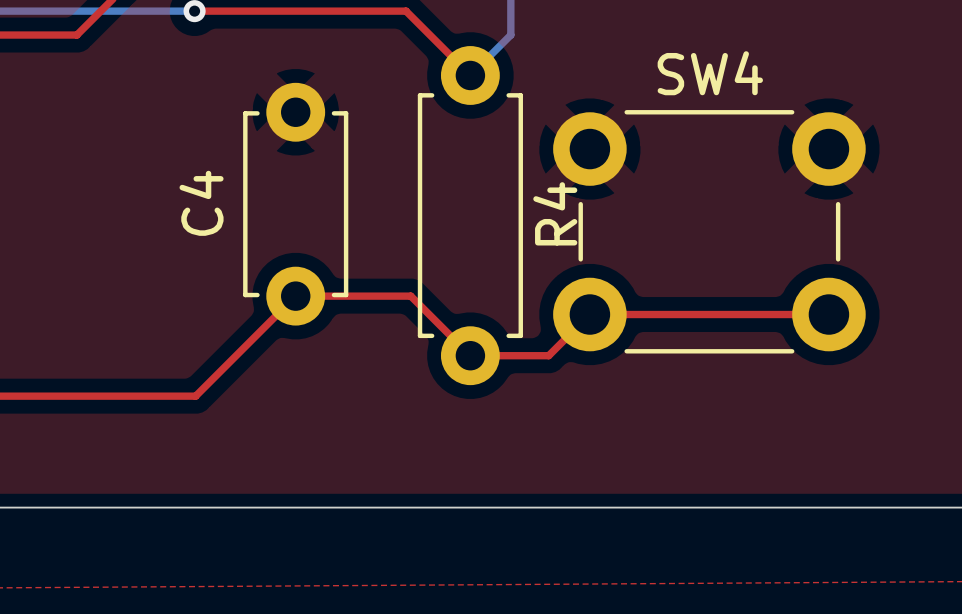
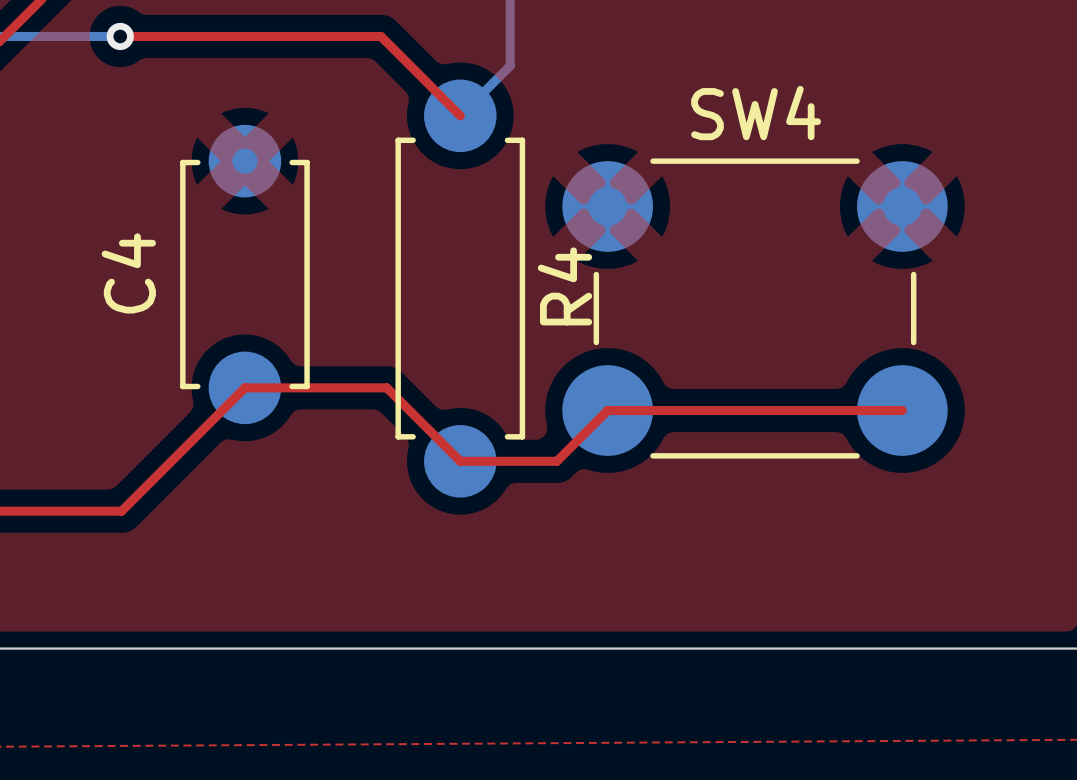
R4 footprint: [417, 46, 523, 386] -> [395, 79, 526, 498]
C4 footprint: [243, 82, 349, 326] -> [180, 124, 310, 425]
SW4 footprint: [553, 110, 866, 354] -> [562, 158, 948, 459]

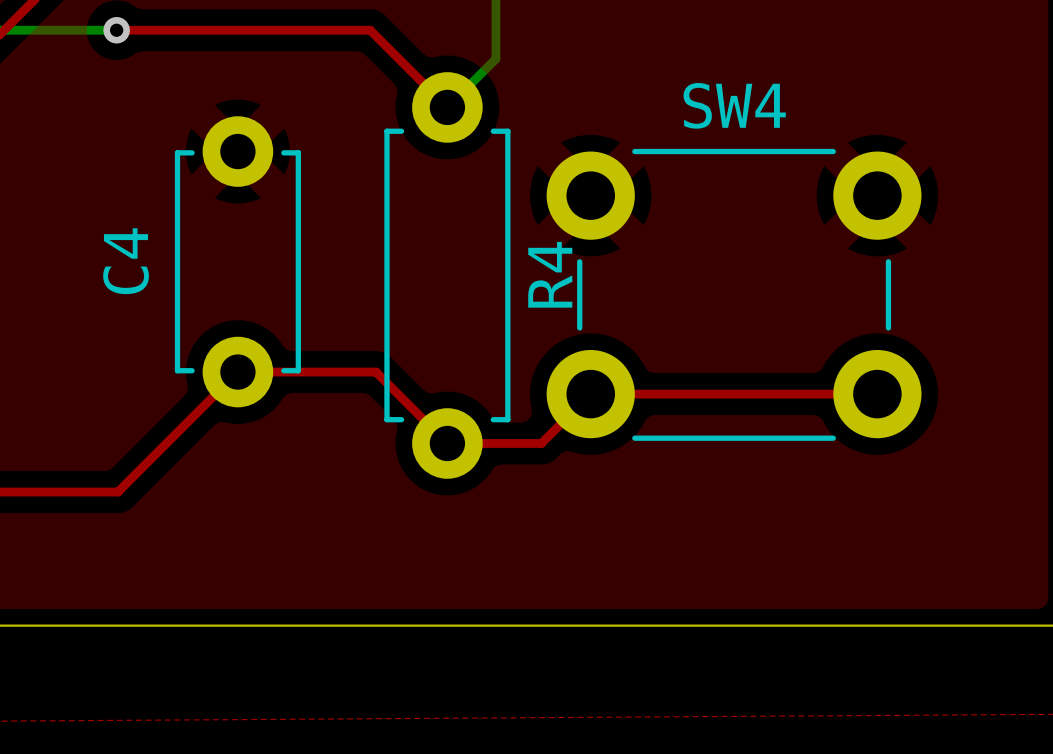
R4 footprint: [395, 79, 526, 498] -> [384, 72, 511, 479]
C4 footprint: [180, 124, 310, 425] -> [174, 116, 301, 408]
SW4 footprint: [562, 158, 948, 459] -> [546, 148, 922, 441]

